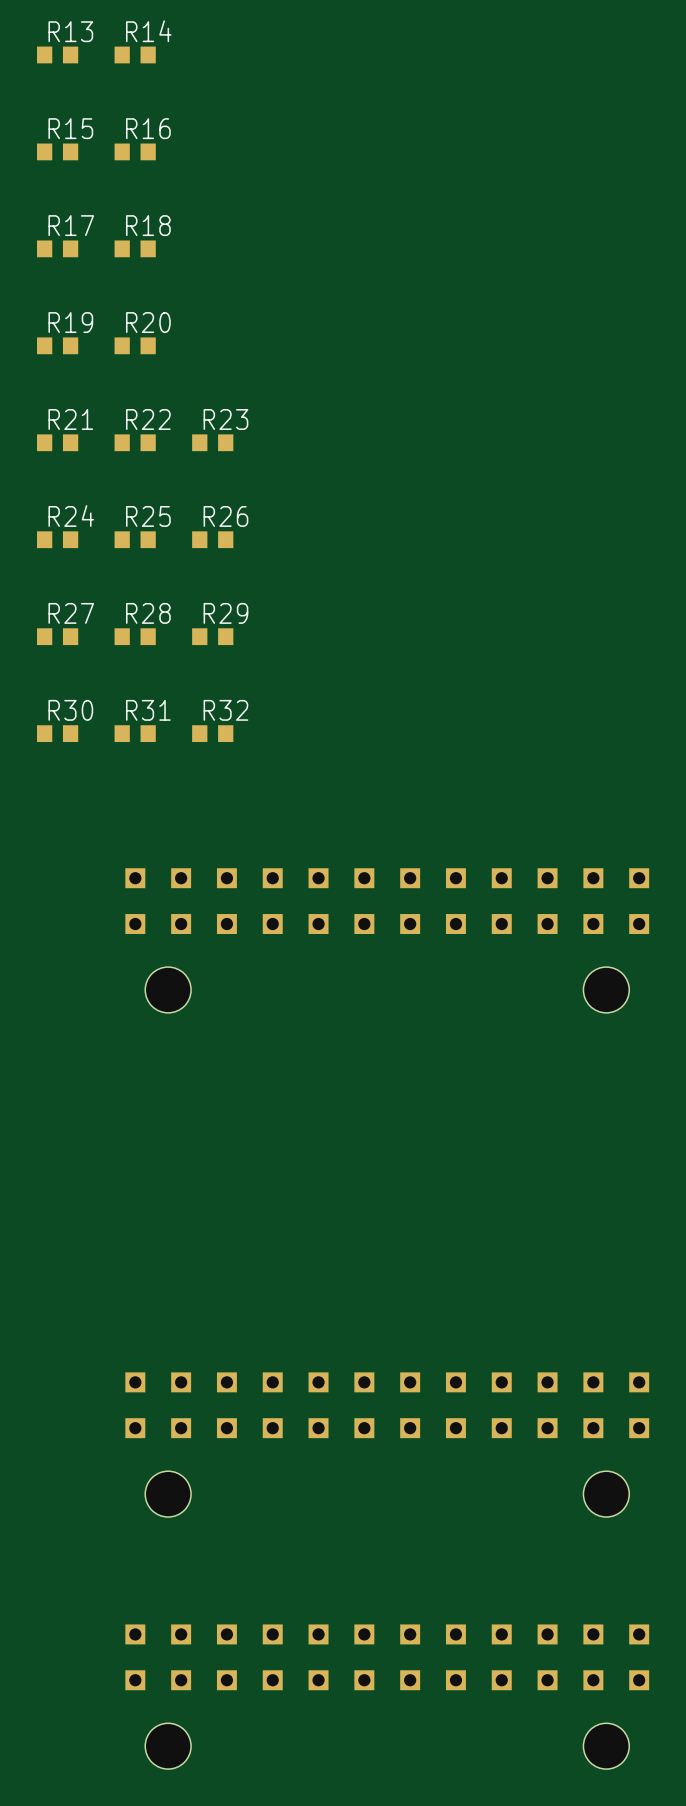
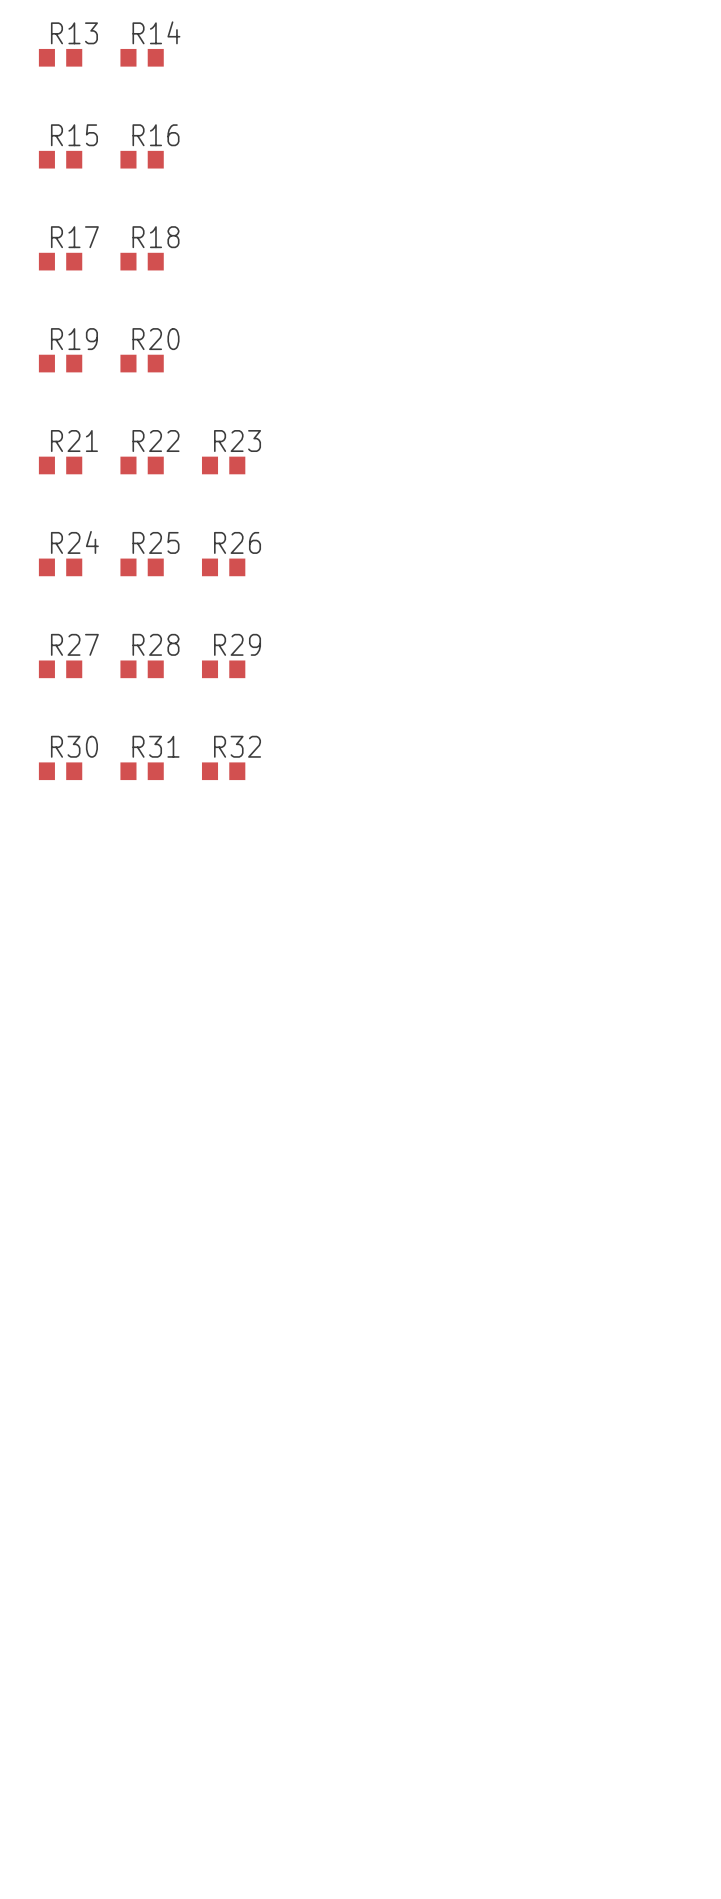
part: (387, 940) -> none
part: (387, 1444) -> none
part: (387, 1696) -> none

